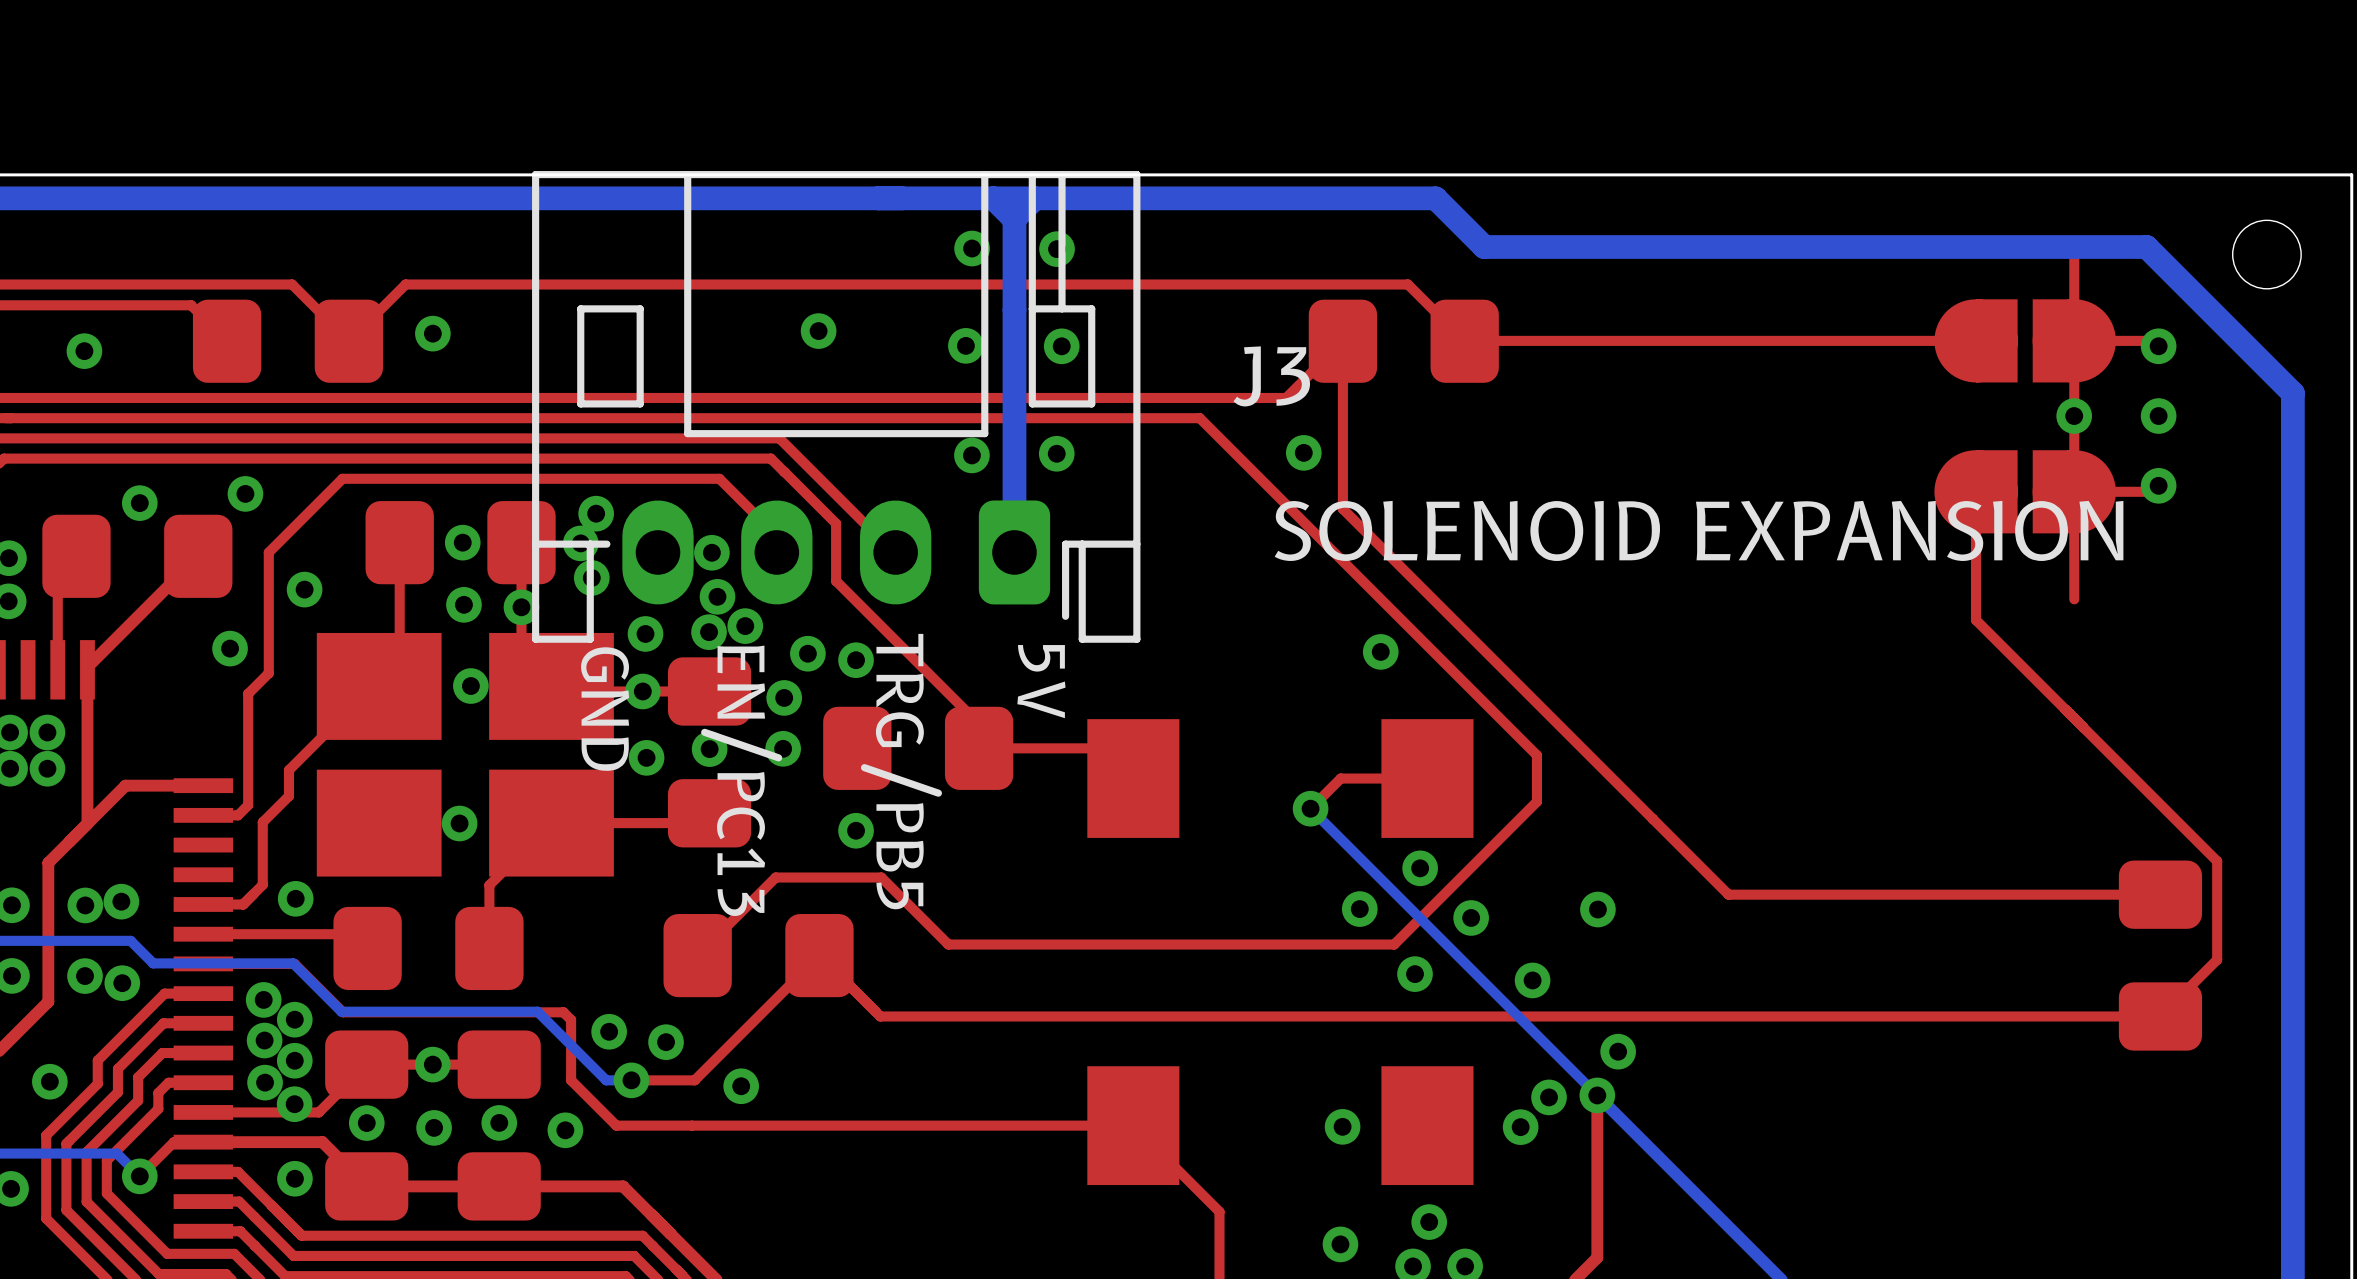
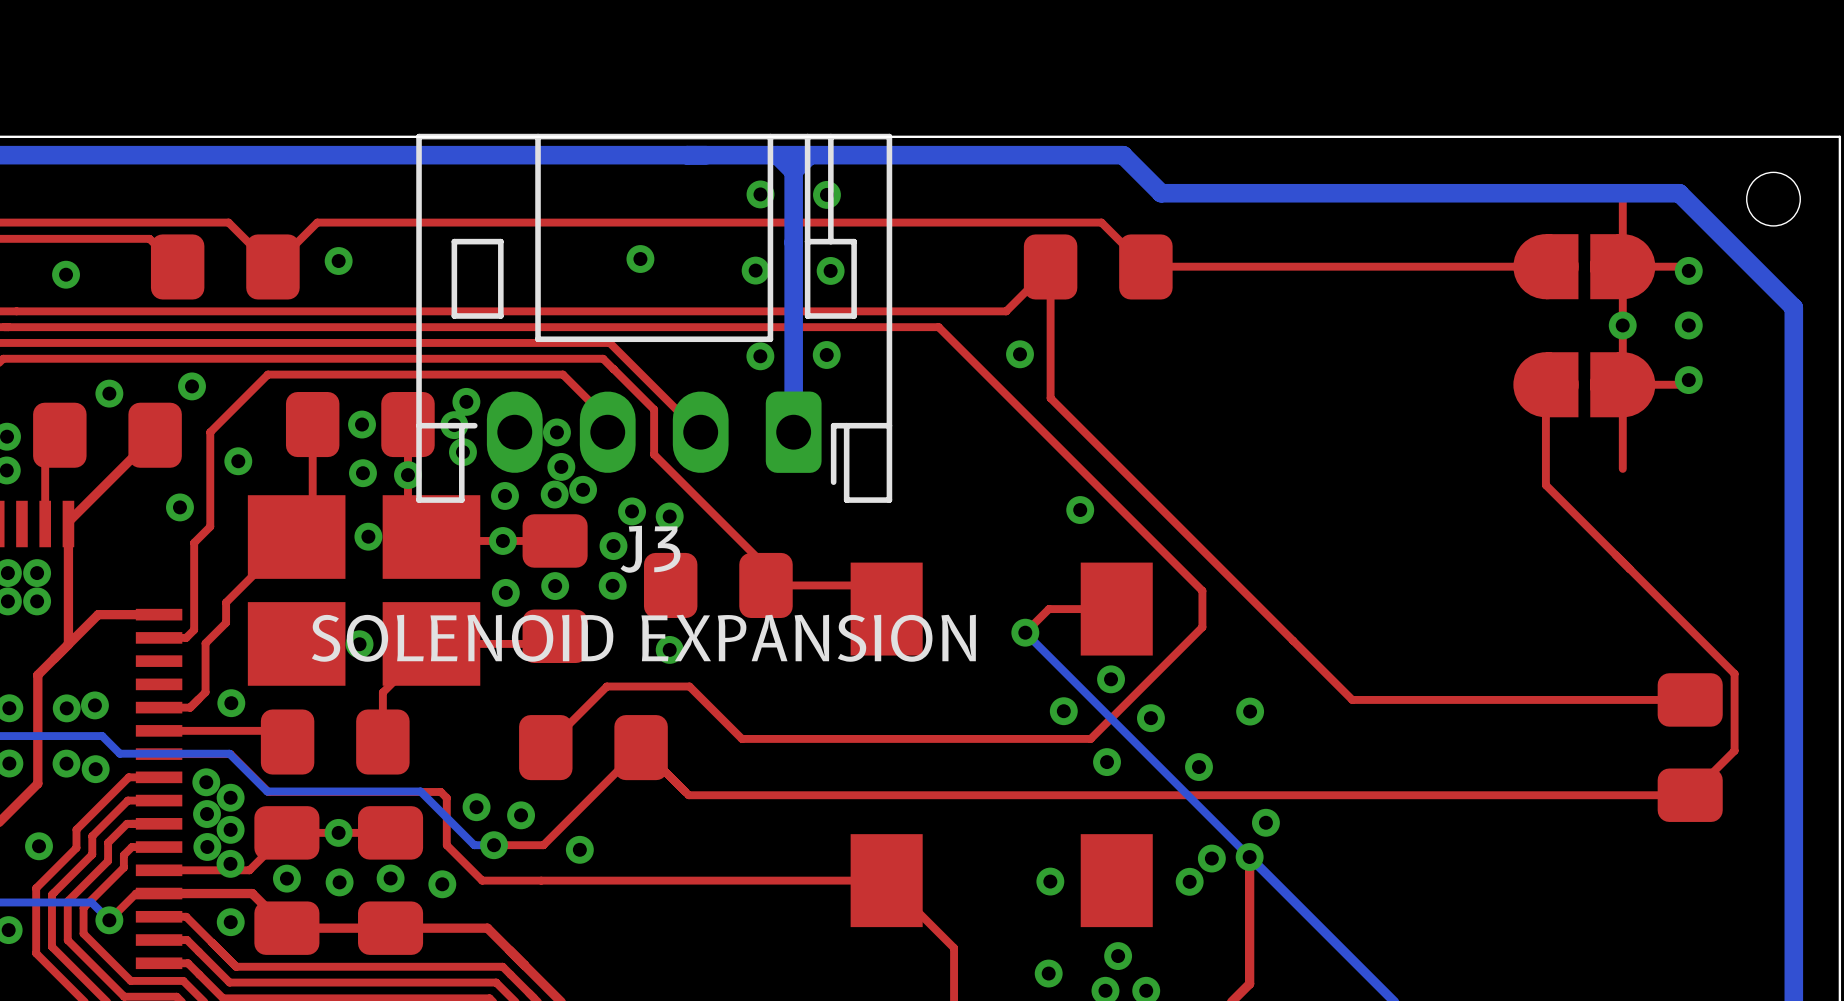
J3 name position: J3 (1271, 376) -> J3 (650, 549)
text position: SOLENOID EXPANSION (1699, 530) -> SOLENOID EXPANSION (643, 638)
text: 5V (1041, 681) -> none
text: EN (741, 682) -> none
text: TRG (899, 690) -> none
text: GND (605, 709) -> none
line: (704, 732) (778, 757) -> none
line: (864, 767) (938, 793) -> none
text: PC13 (741, 844) -> none
text: PB5 (900, 856) -> none

